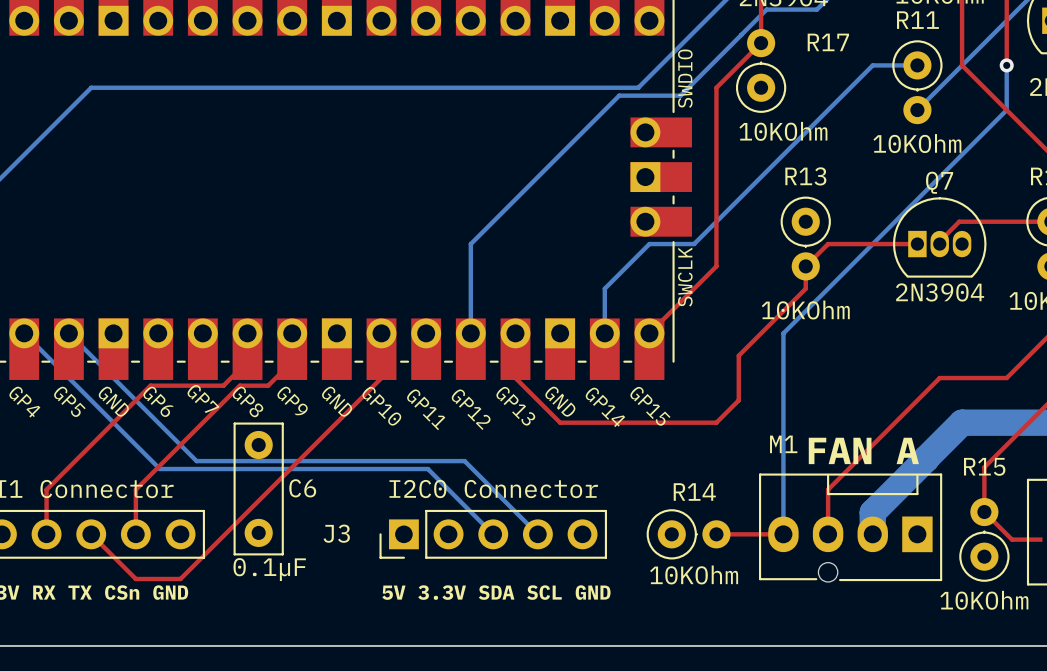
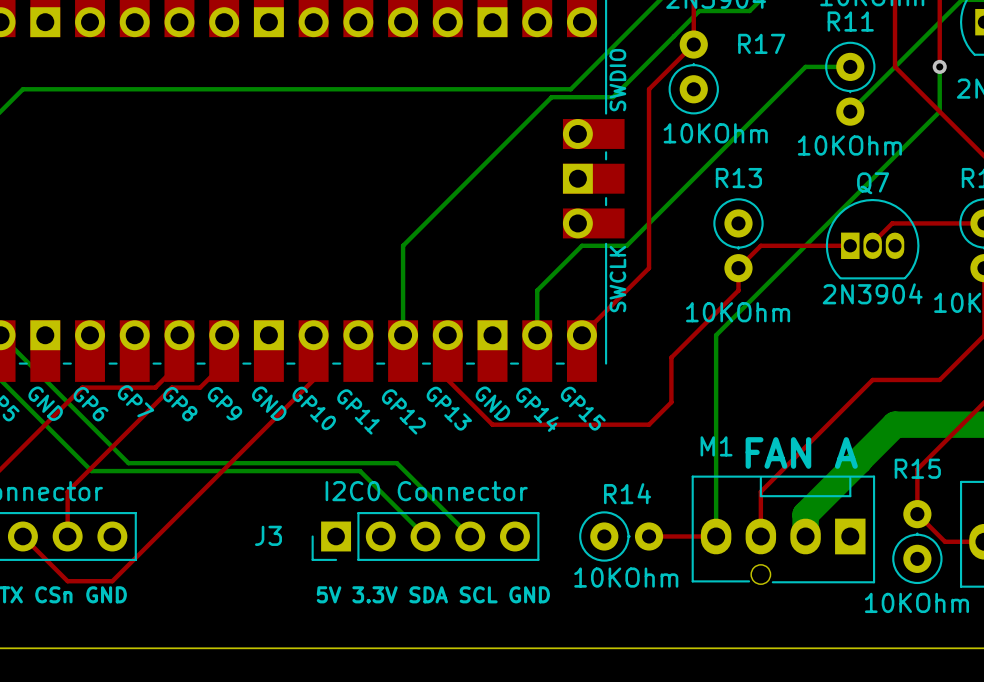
C6: 0.1µF (258, 488) -> none

